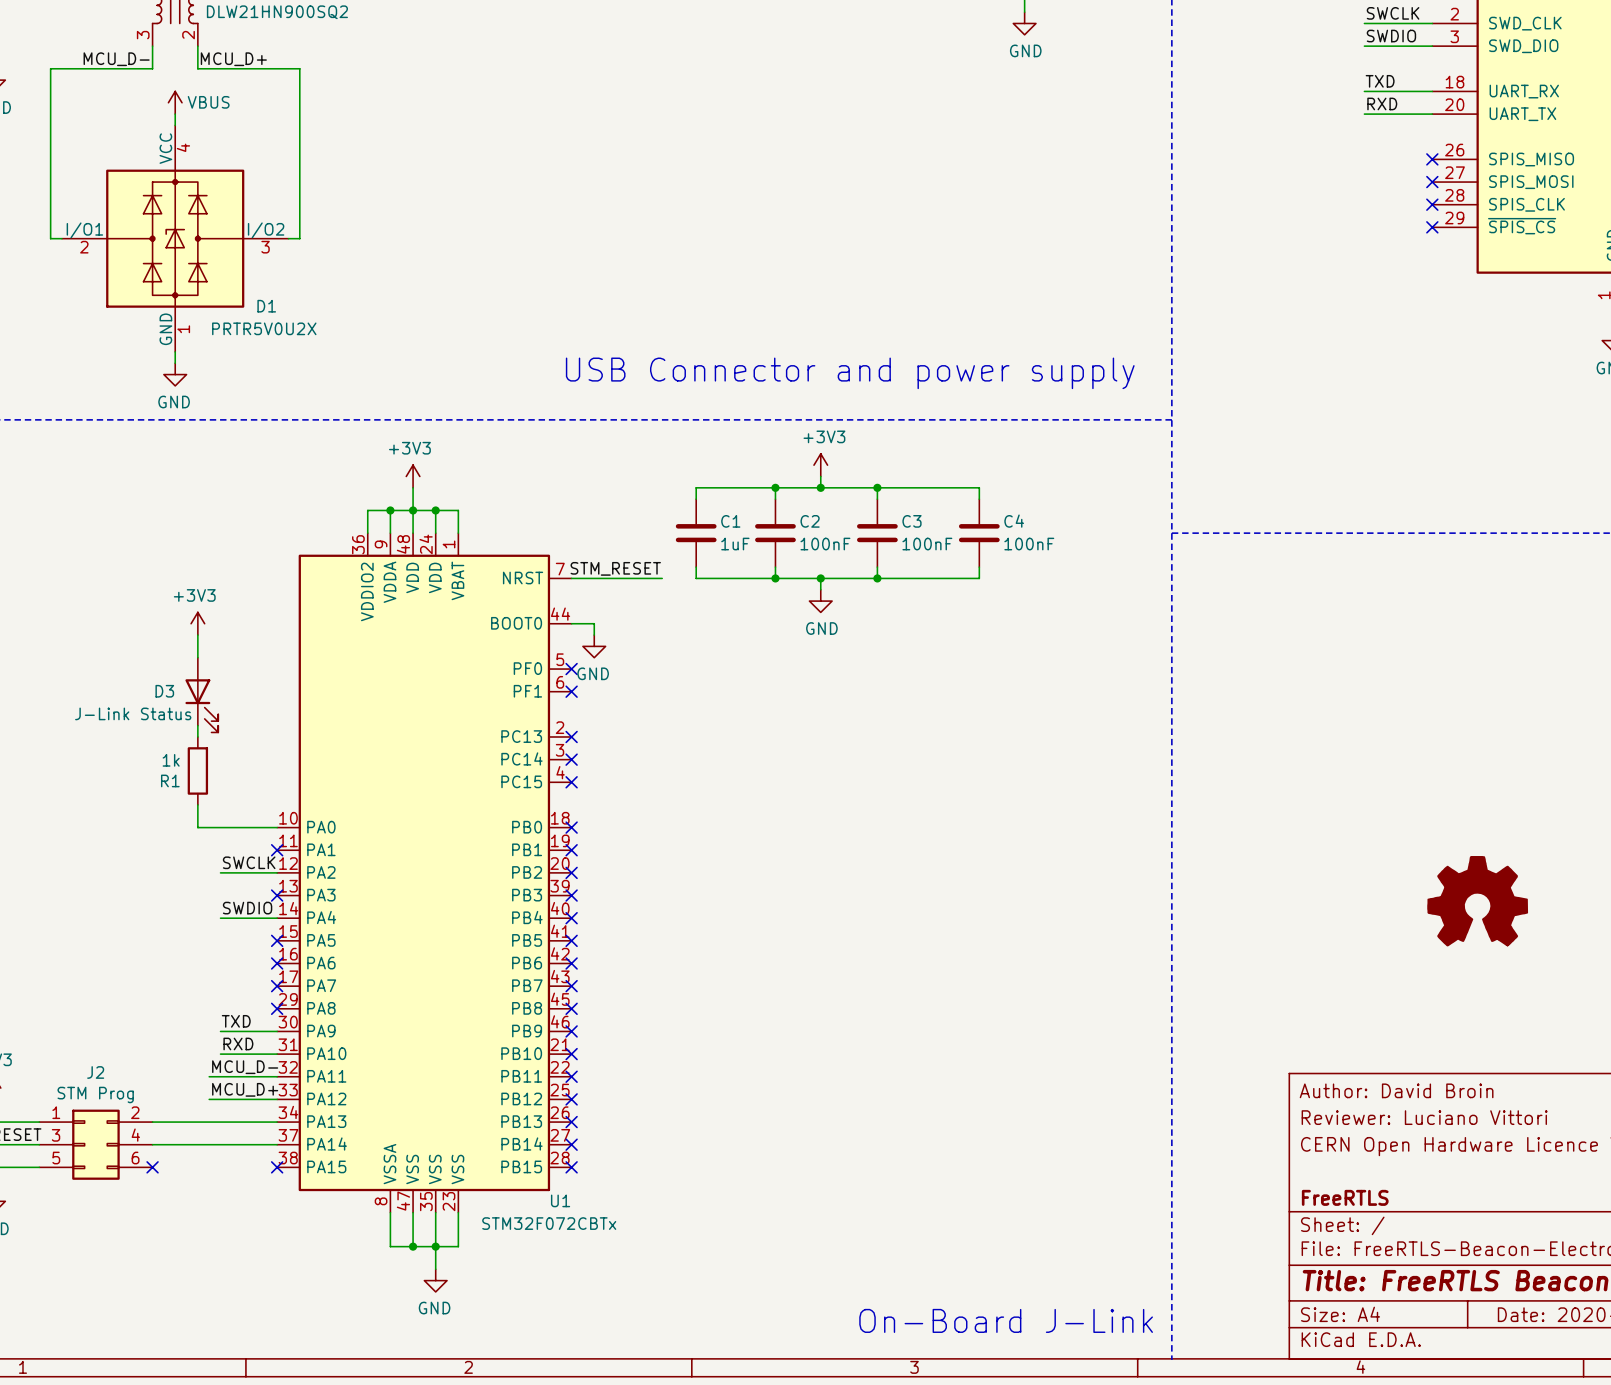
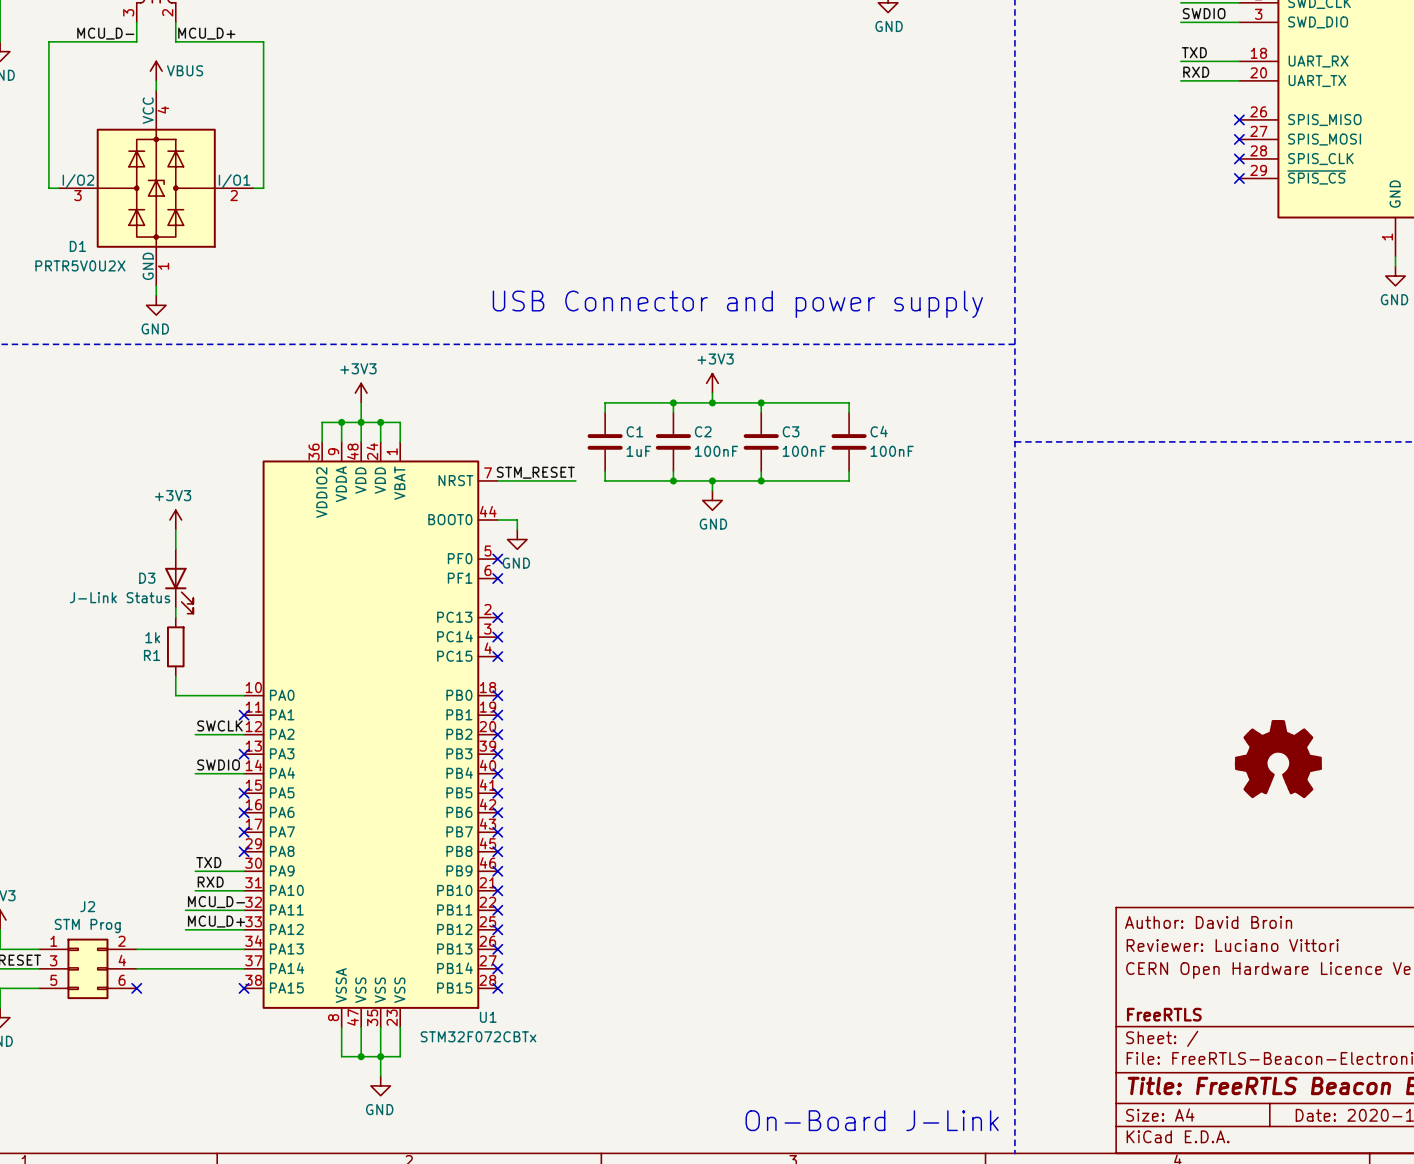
D1 flip: as is (175, 238) -> left-right (156, 188)

